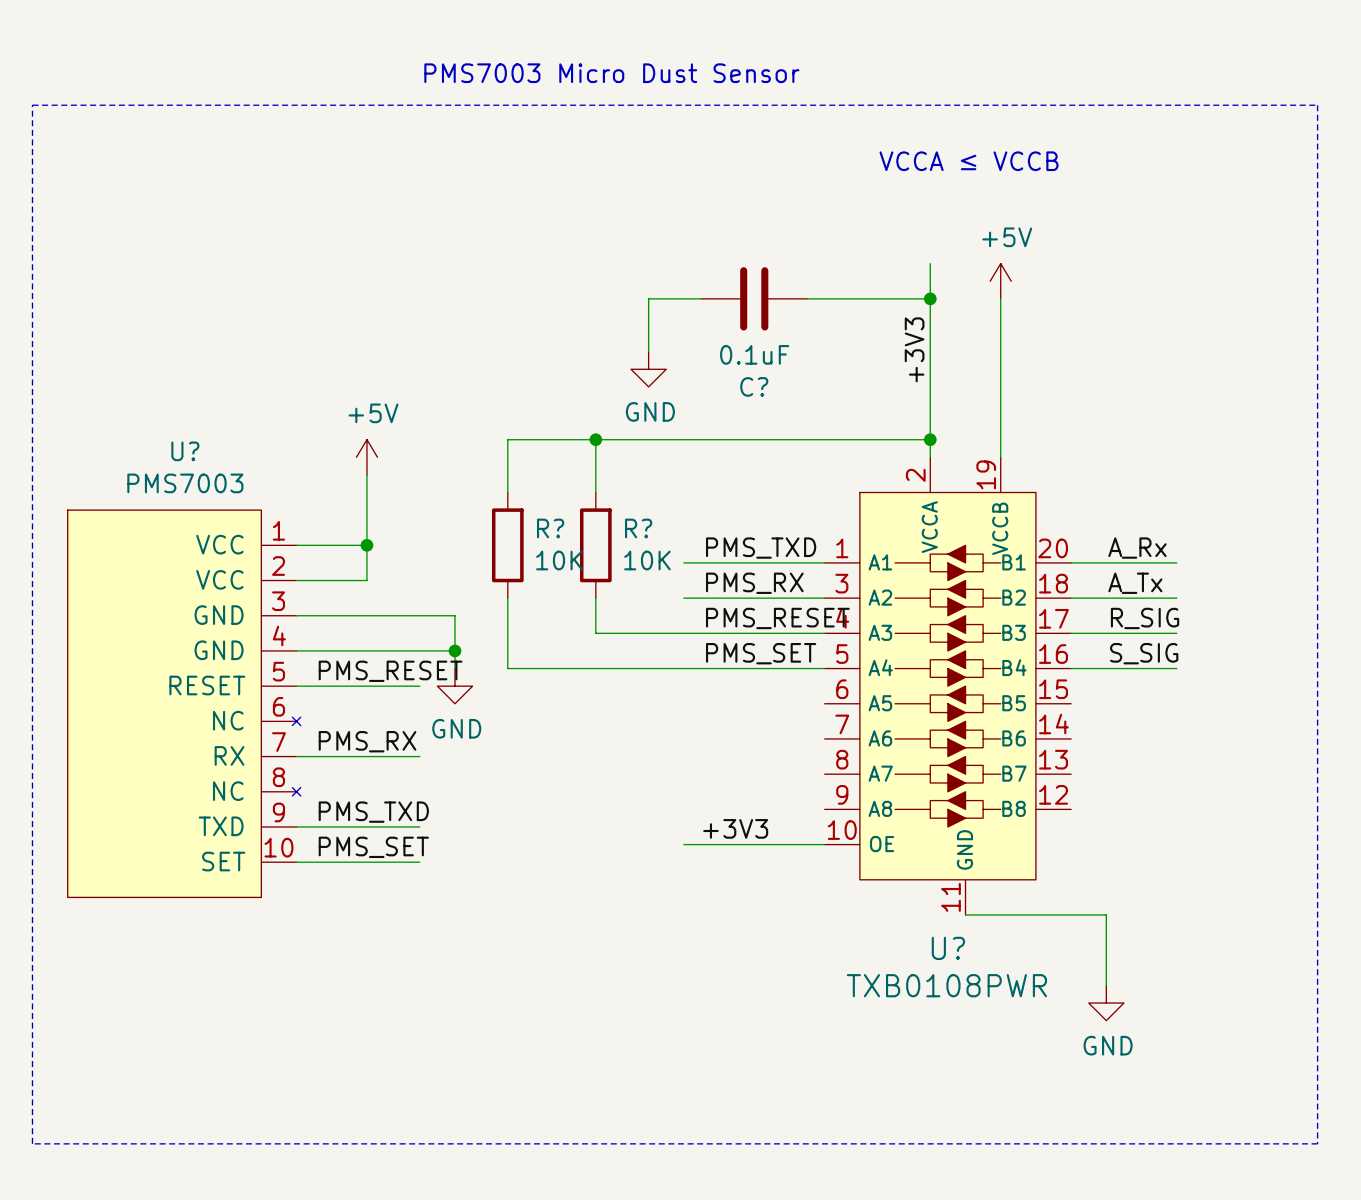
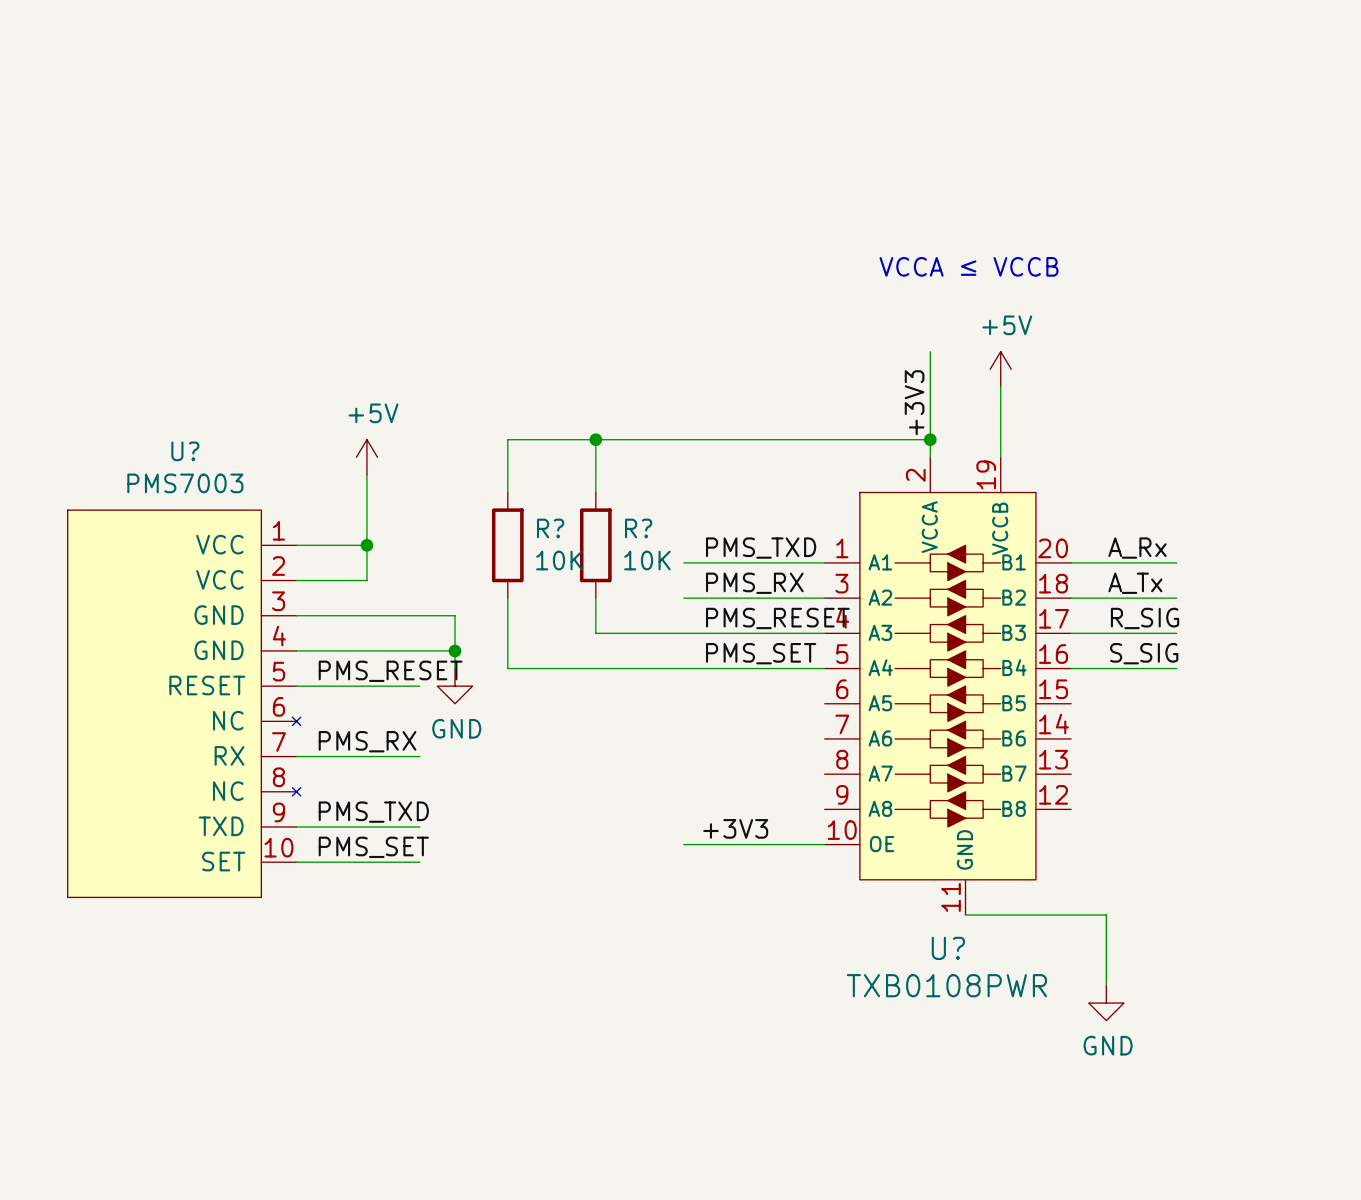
text: PMS7003 Micro Dust Sensor (611, 73) -> none
line: (32, 105) (1317, 105) (1317, 1143) (32, 1143) (32, 105) -> none
text position: VCCA ≤ VCCB (968, 161) -> VCCA ≤ VCCB (968, 266)
wire: (930, 263) (930, 351) -> none
power symbol position: +5V (1000, 281) -> +5V (1000, 369)
wire: (701, 298) (648, 298) (648, 351) -> none
C?: 0.1uF (754, 298) -> none
wire: (807, 298) (930, 298) -> none
junction: (930, 298) -> none
wire: (1000, 298) (1000, 386) -> none
label position: +3V3 (914, 349) -> +3V3 (914, 402)
power symbol: GND (648, 369) -> none

